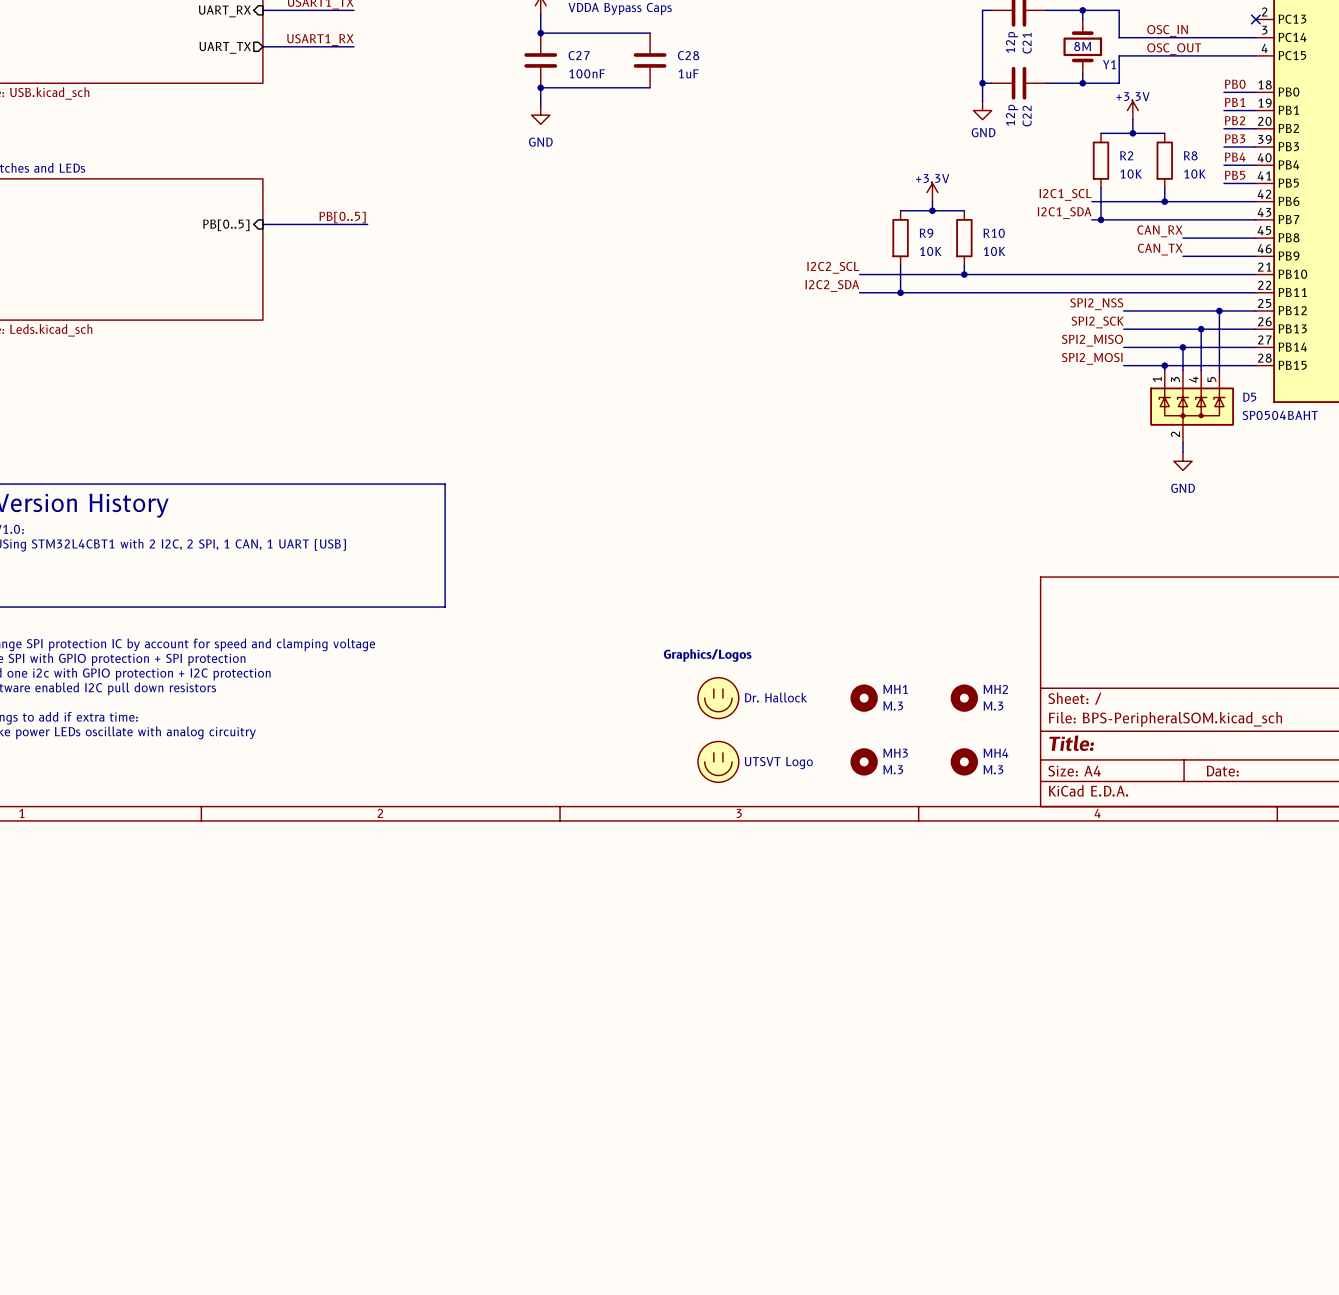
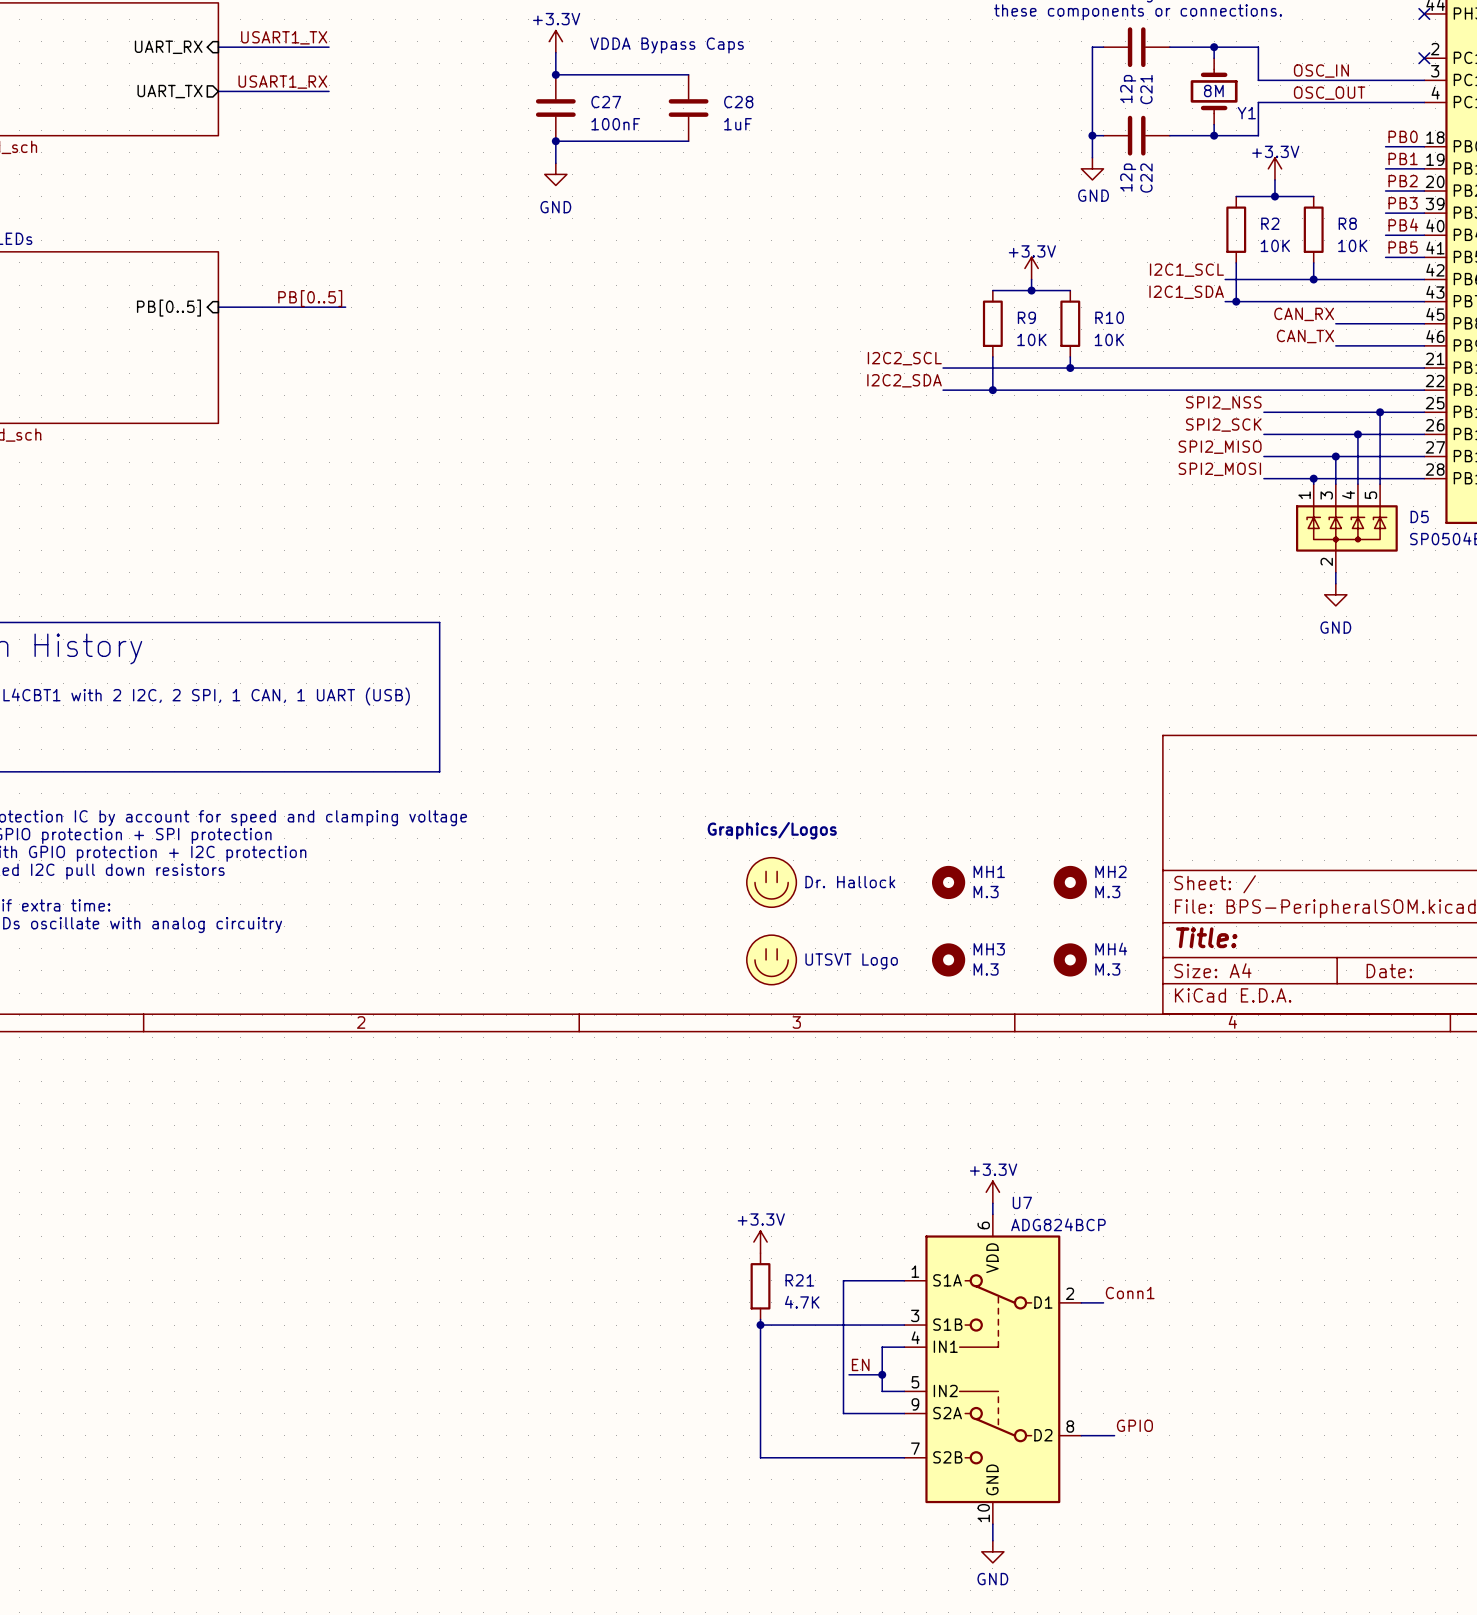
power symbol: none -> +3.3V (992, 1192)
wire: none -> (992, 1203) (992, 1214)
power symbol: none -> +3.3V (760, 1242)
wire: none -> (904, 1280) (843, 1280) (843, 1413) (904, 1413)
R21: none -> 4.7K (760, 1286)
label: none -> Conn1 (1130, 1293)
wire: none -> (1081, 1302) (1103, 1302)
wire: none -> (760, 1319) (760, 1457) (904, 1457)
wire: none -> (760, 1325) (904, 1325)
junction: none -> (760, 1325)
wire: none -> (904, 1347) (882, 1347) (882, 1391) (904, 1391)
label: none -> EN (860, 1364)
U7: none -> ADG824BCP (992, 1369)
wire: none -> (849, 1374) (882, 1374)
junction: none -> (882, 1374)
label: none -> GPIO (1134, 1425)
wire: none -> (1081, 1435) (1114, 1435)
wire: none -> (992, 1524) (992, 1540)
power symbol: none -> GND (992, 1551)

